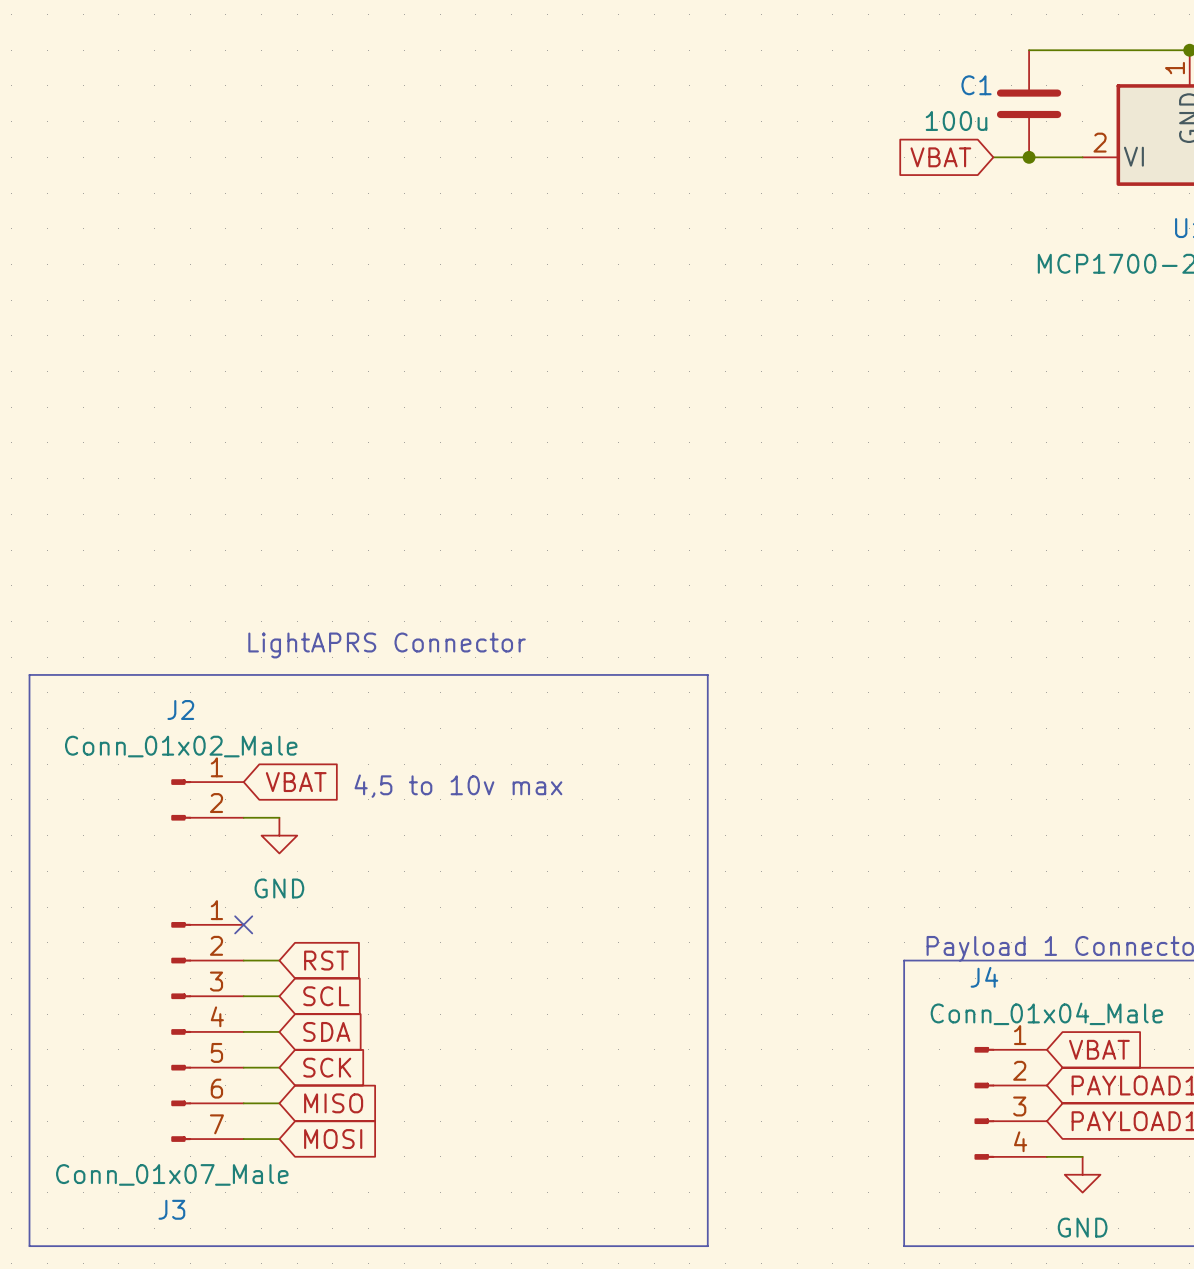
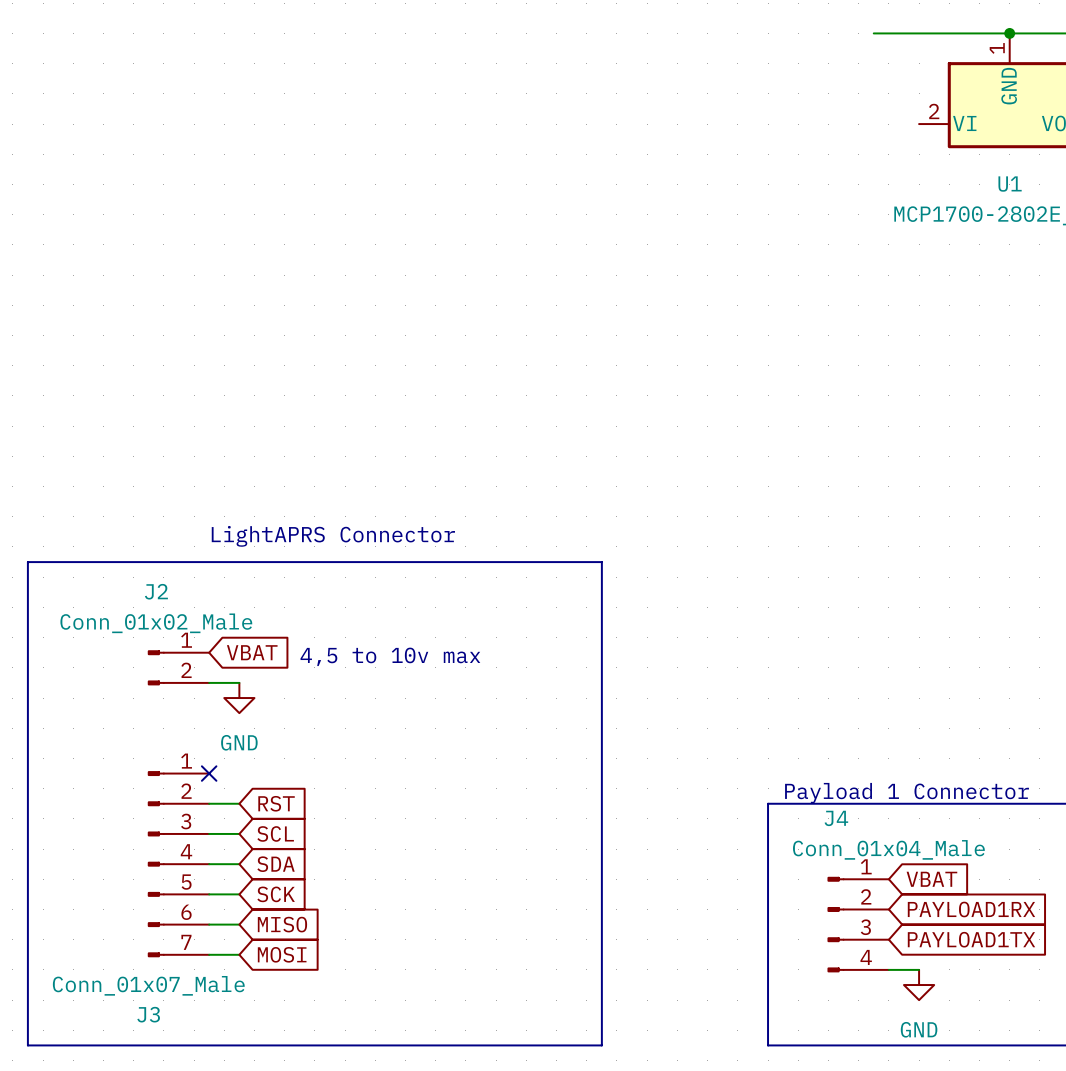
C1: 100u (1029, 103) -> none
global label: VBAT (940, 157) -> none
wire: (993, 157) (1082, 157) -> none
junction: (1029, 157) -> none

